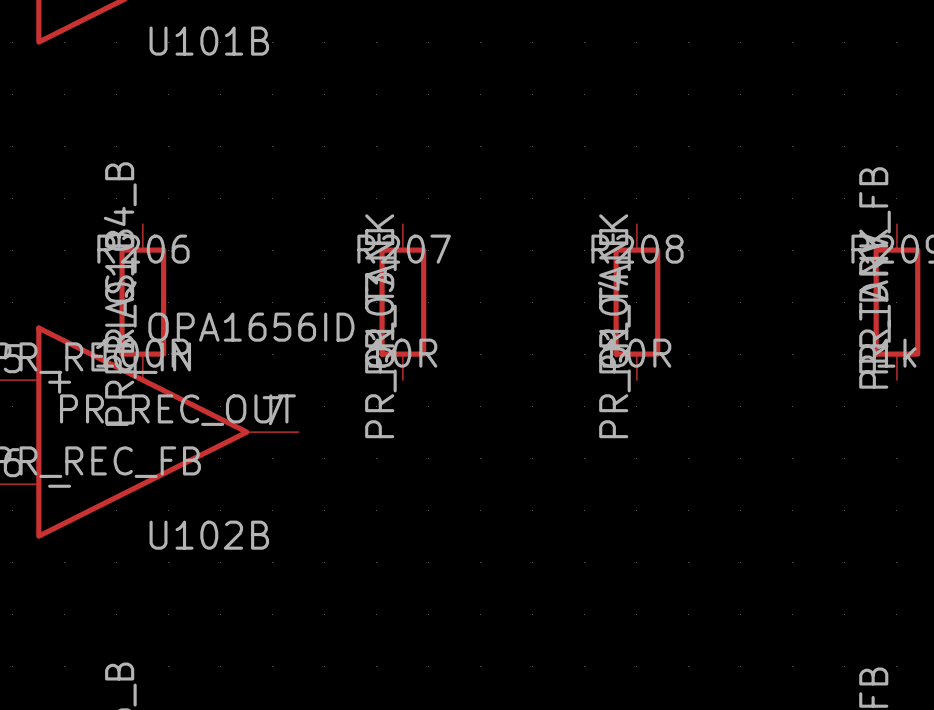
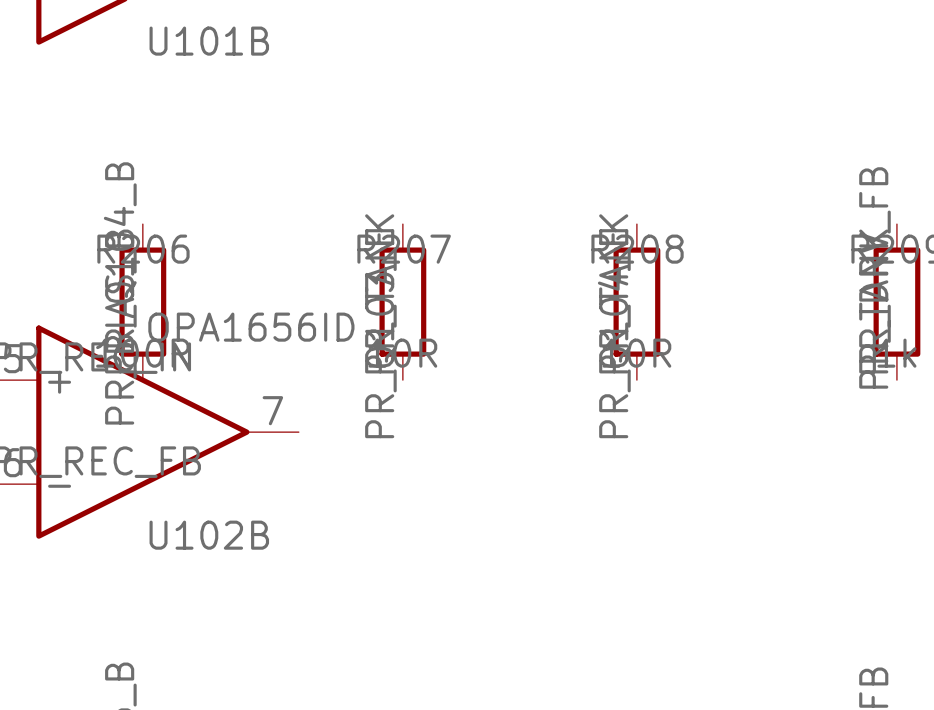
label: PR_REC_OUT (177, 410) -> none

